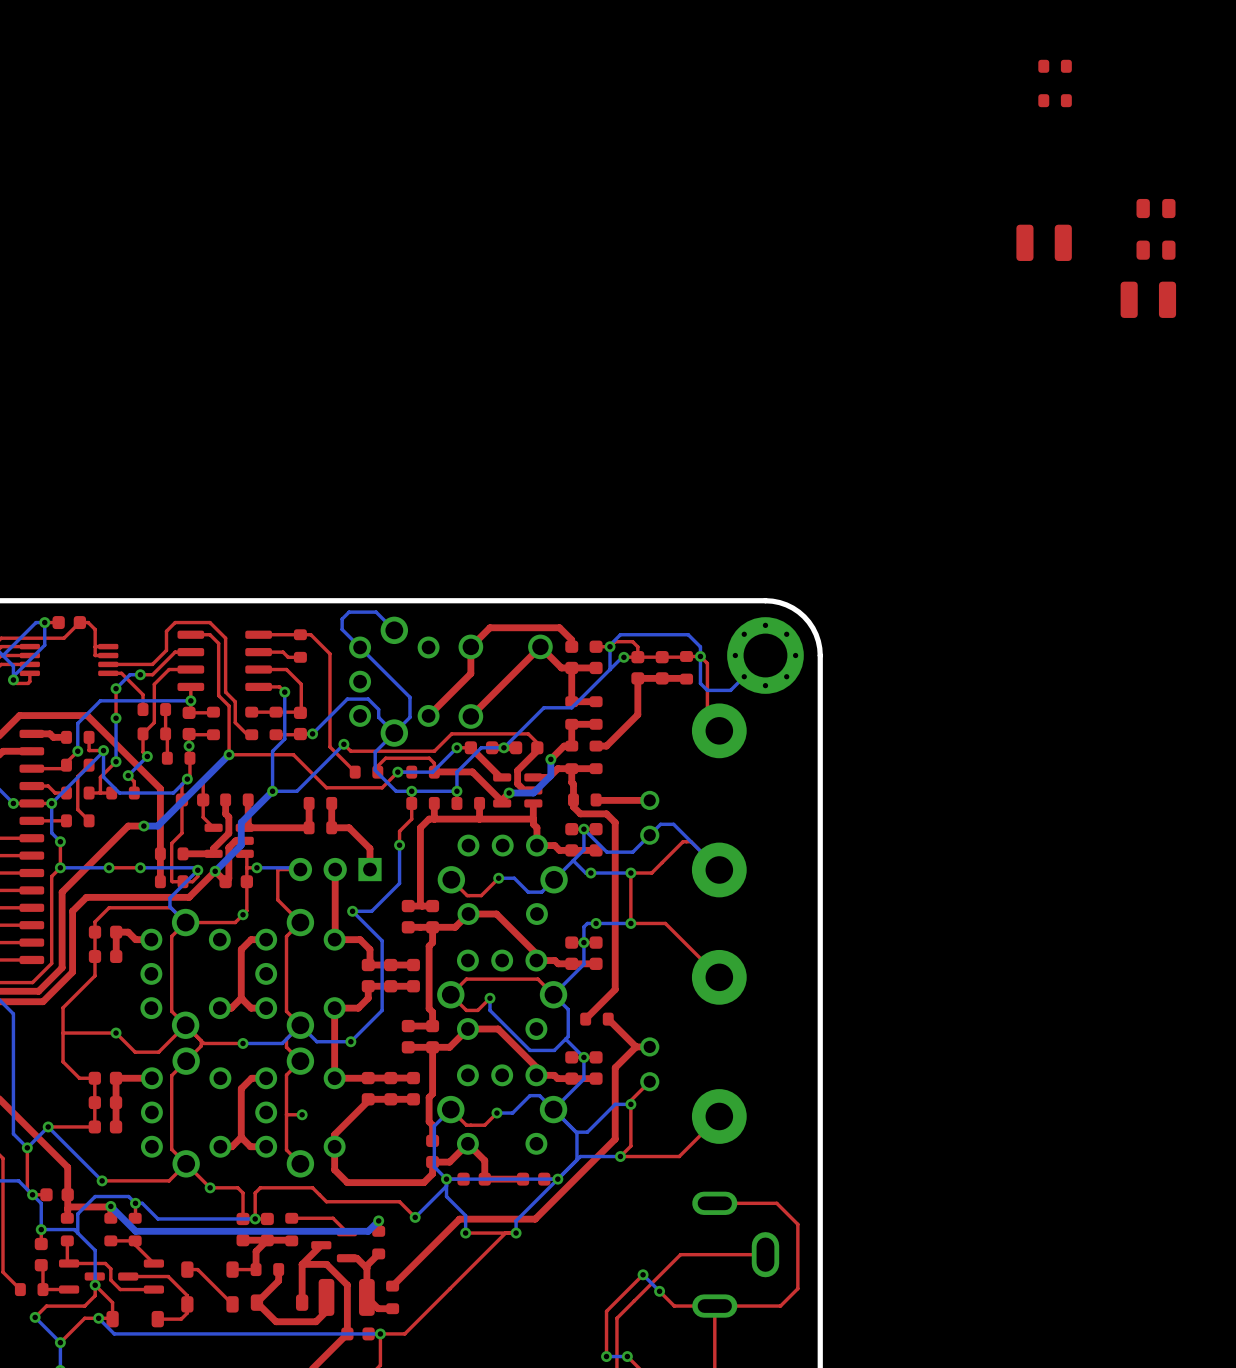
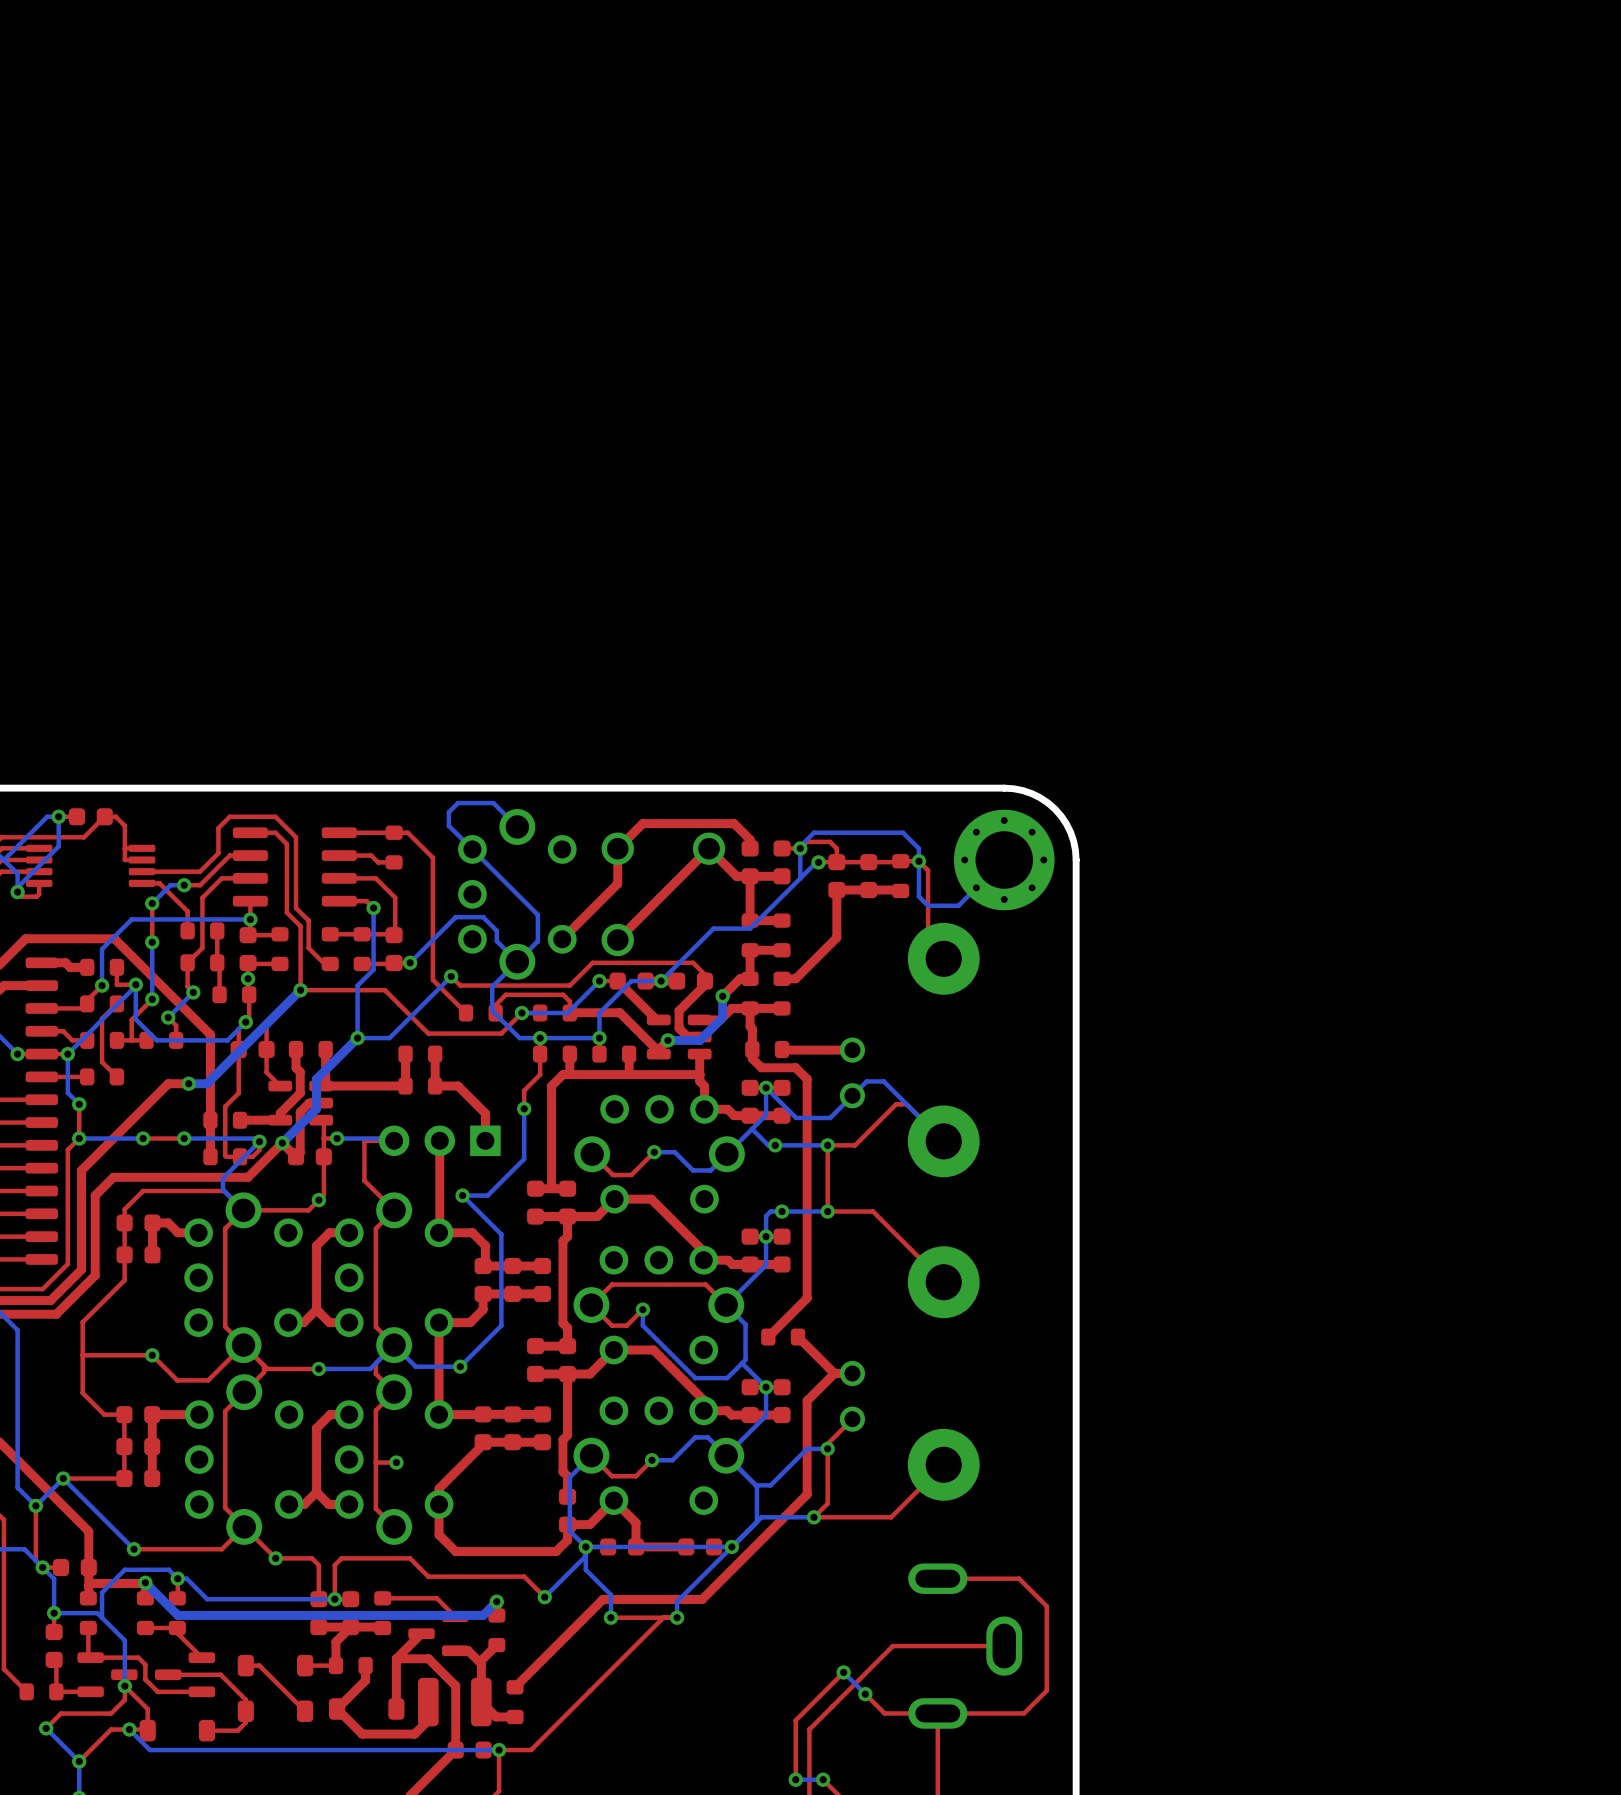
part: (1055, 66) -> none
part: (1055, 100) -> none
part: (1156, 208) -> none
part: (1044, 242) -> none
part: (1156, 250) -> none
part: (1148, 299) -> none

